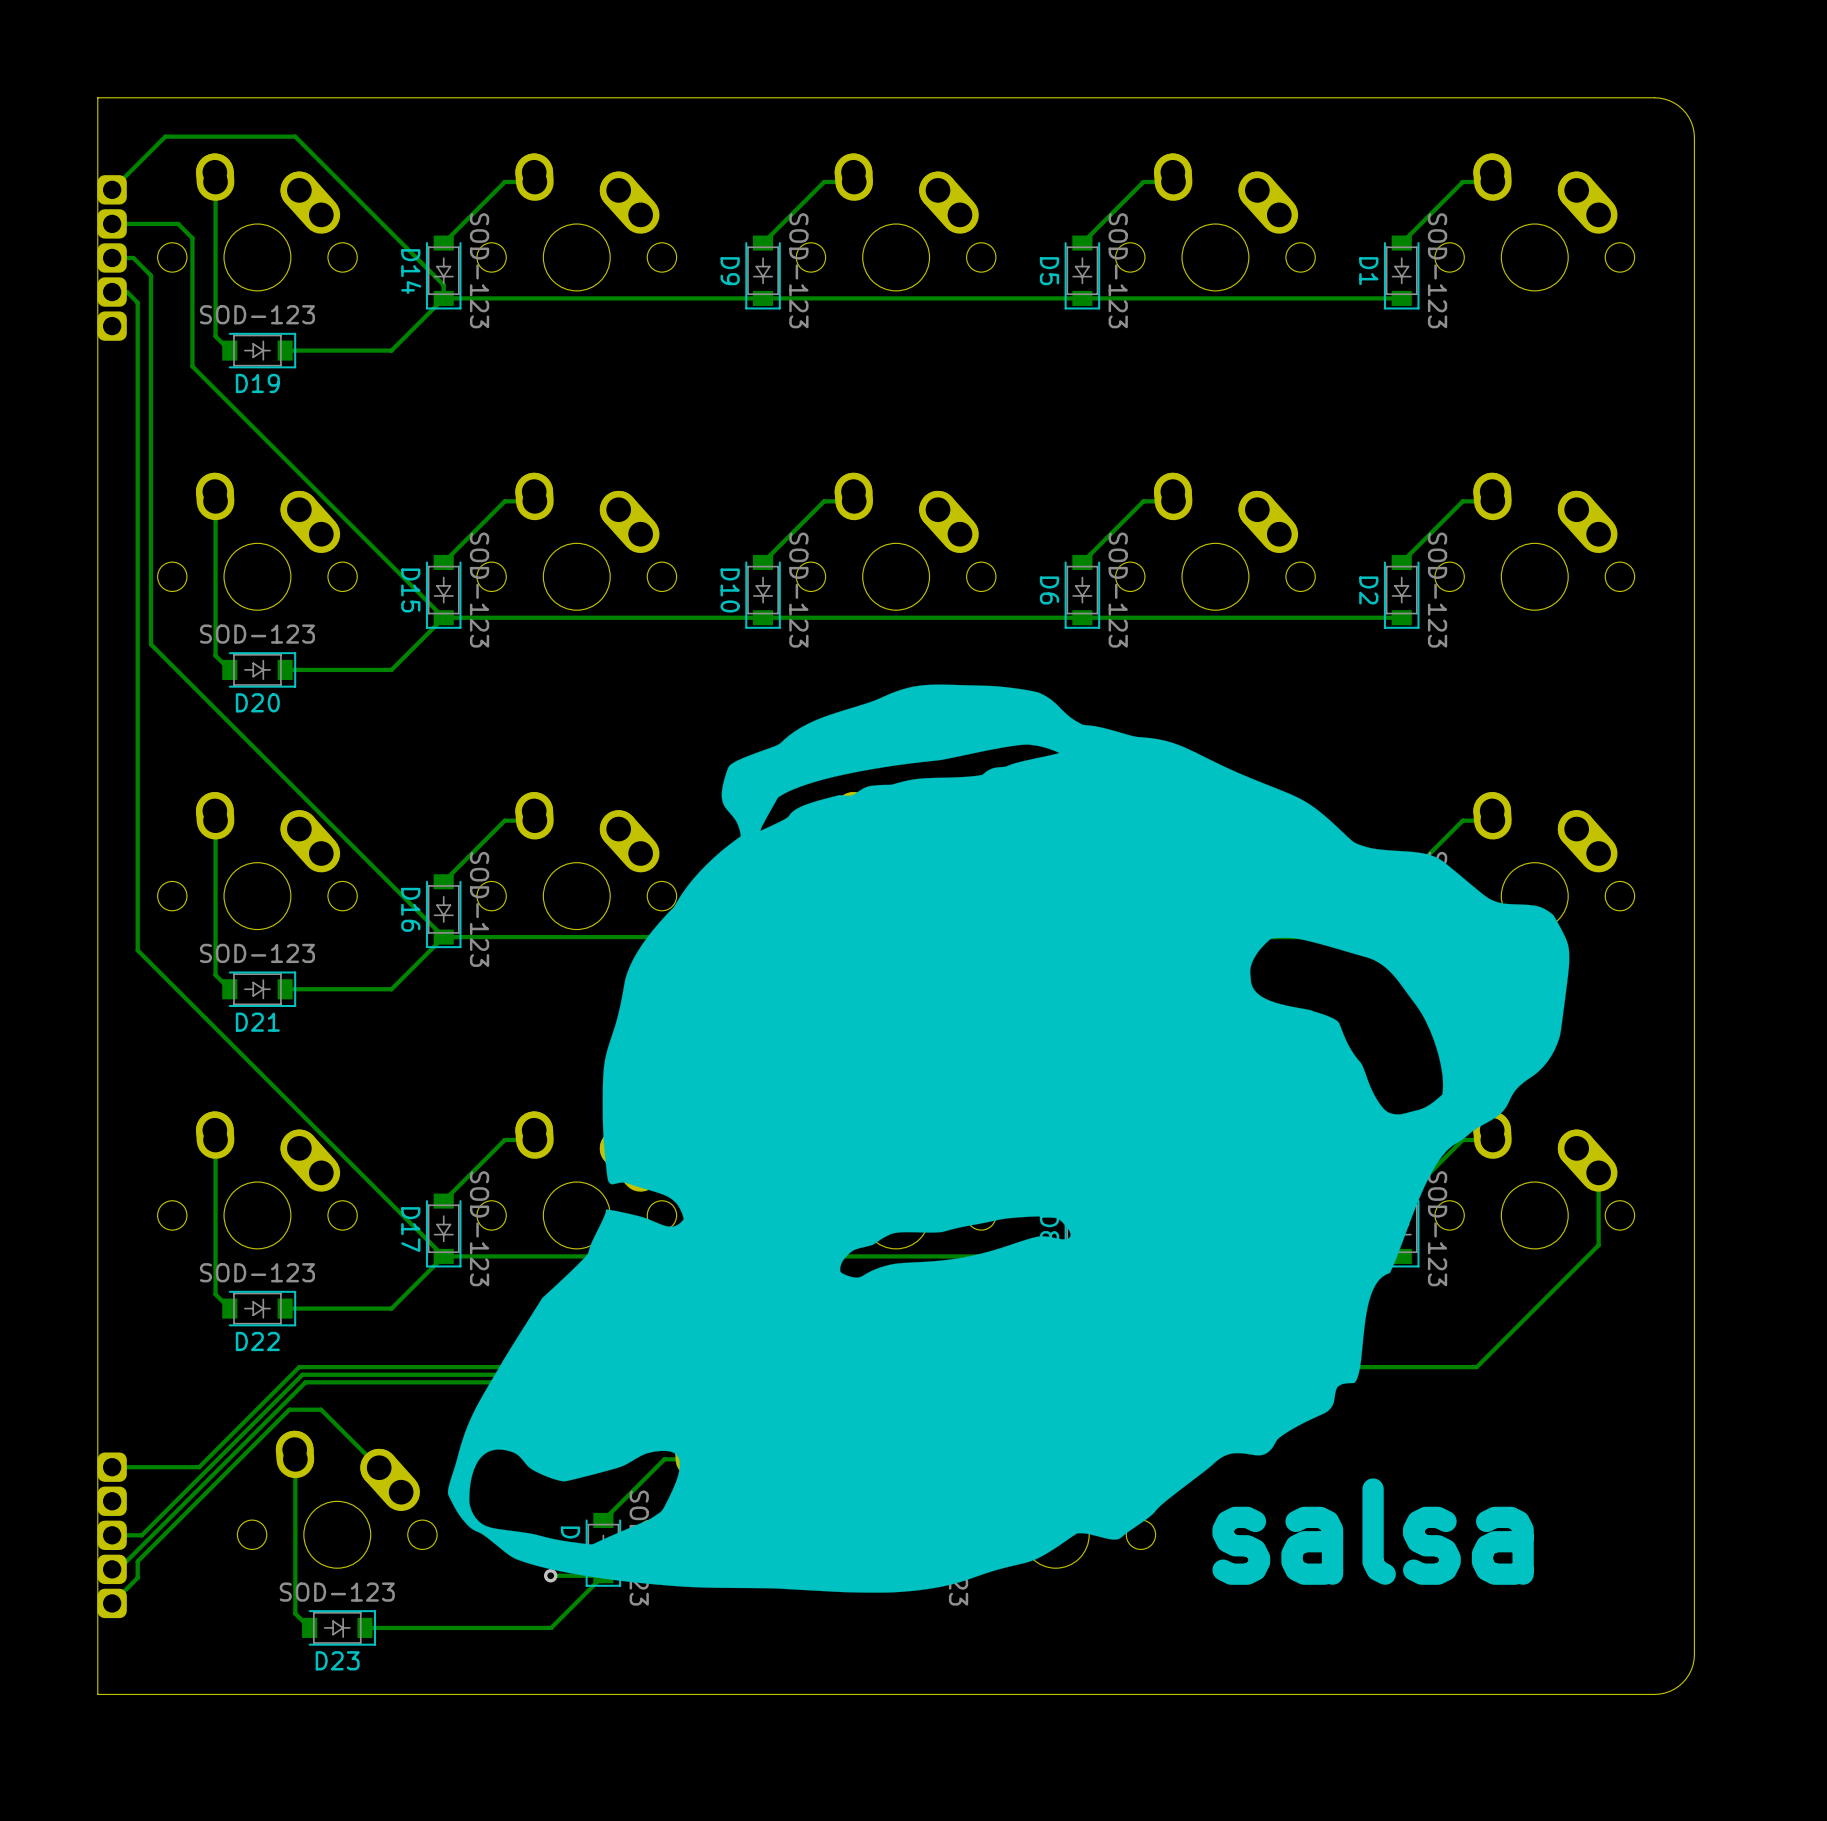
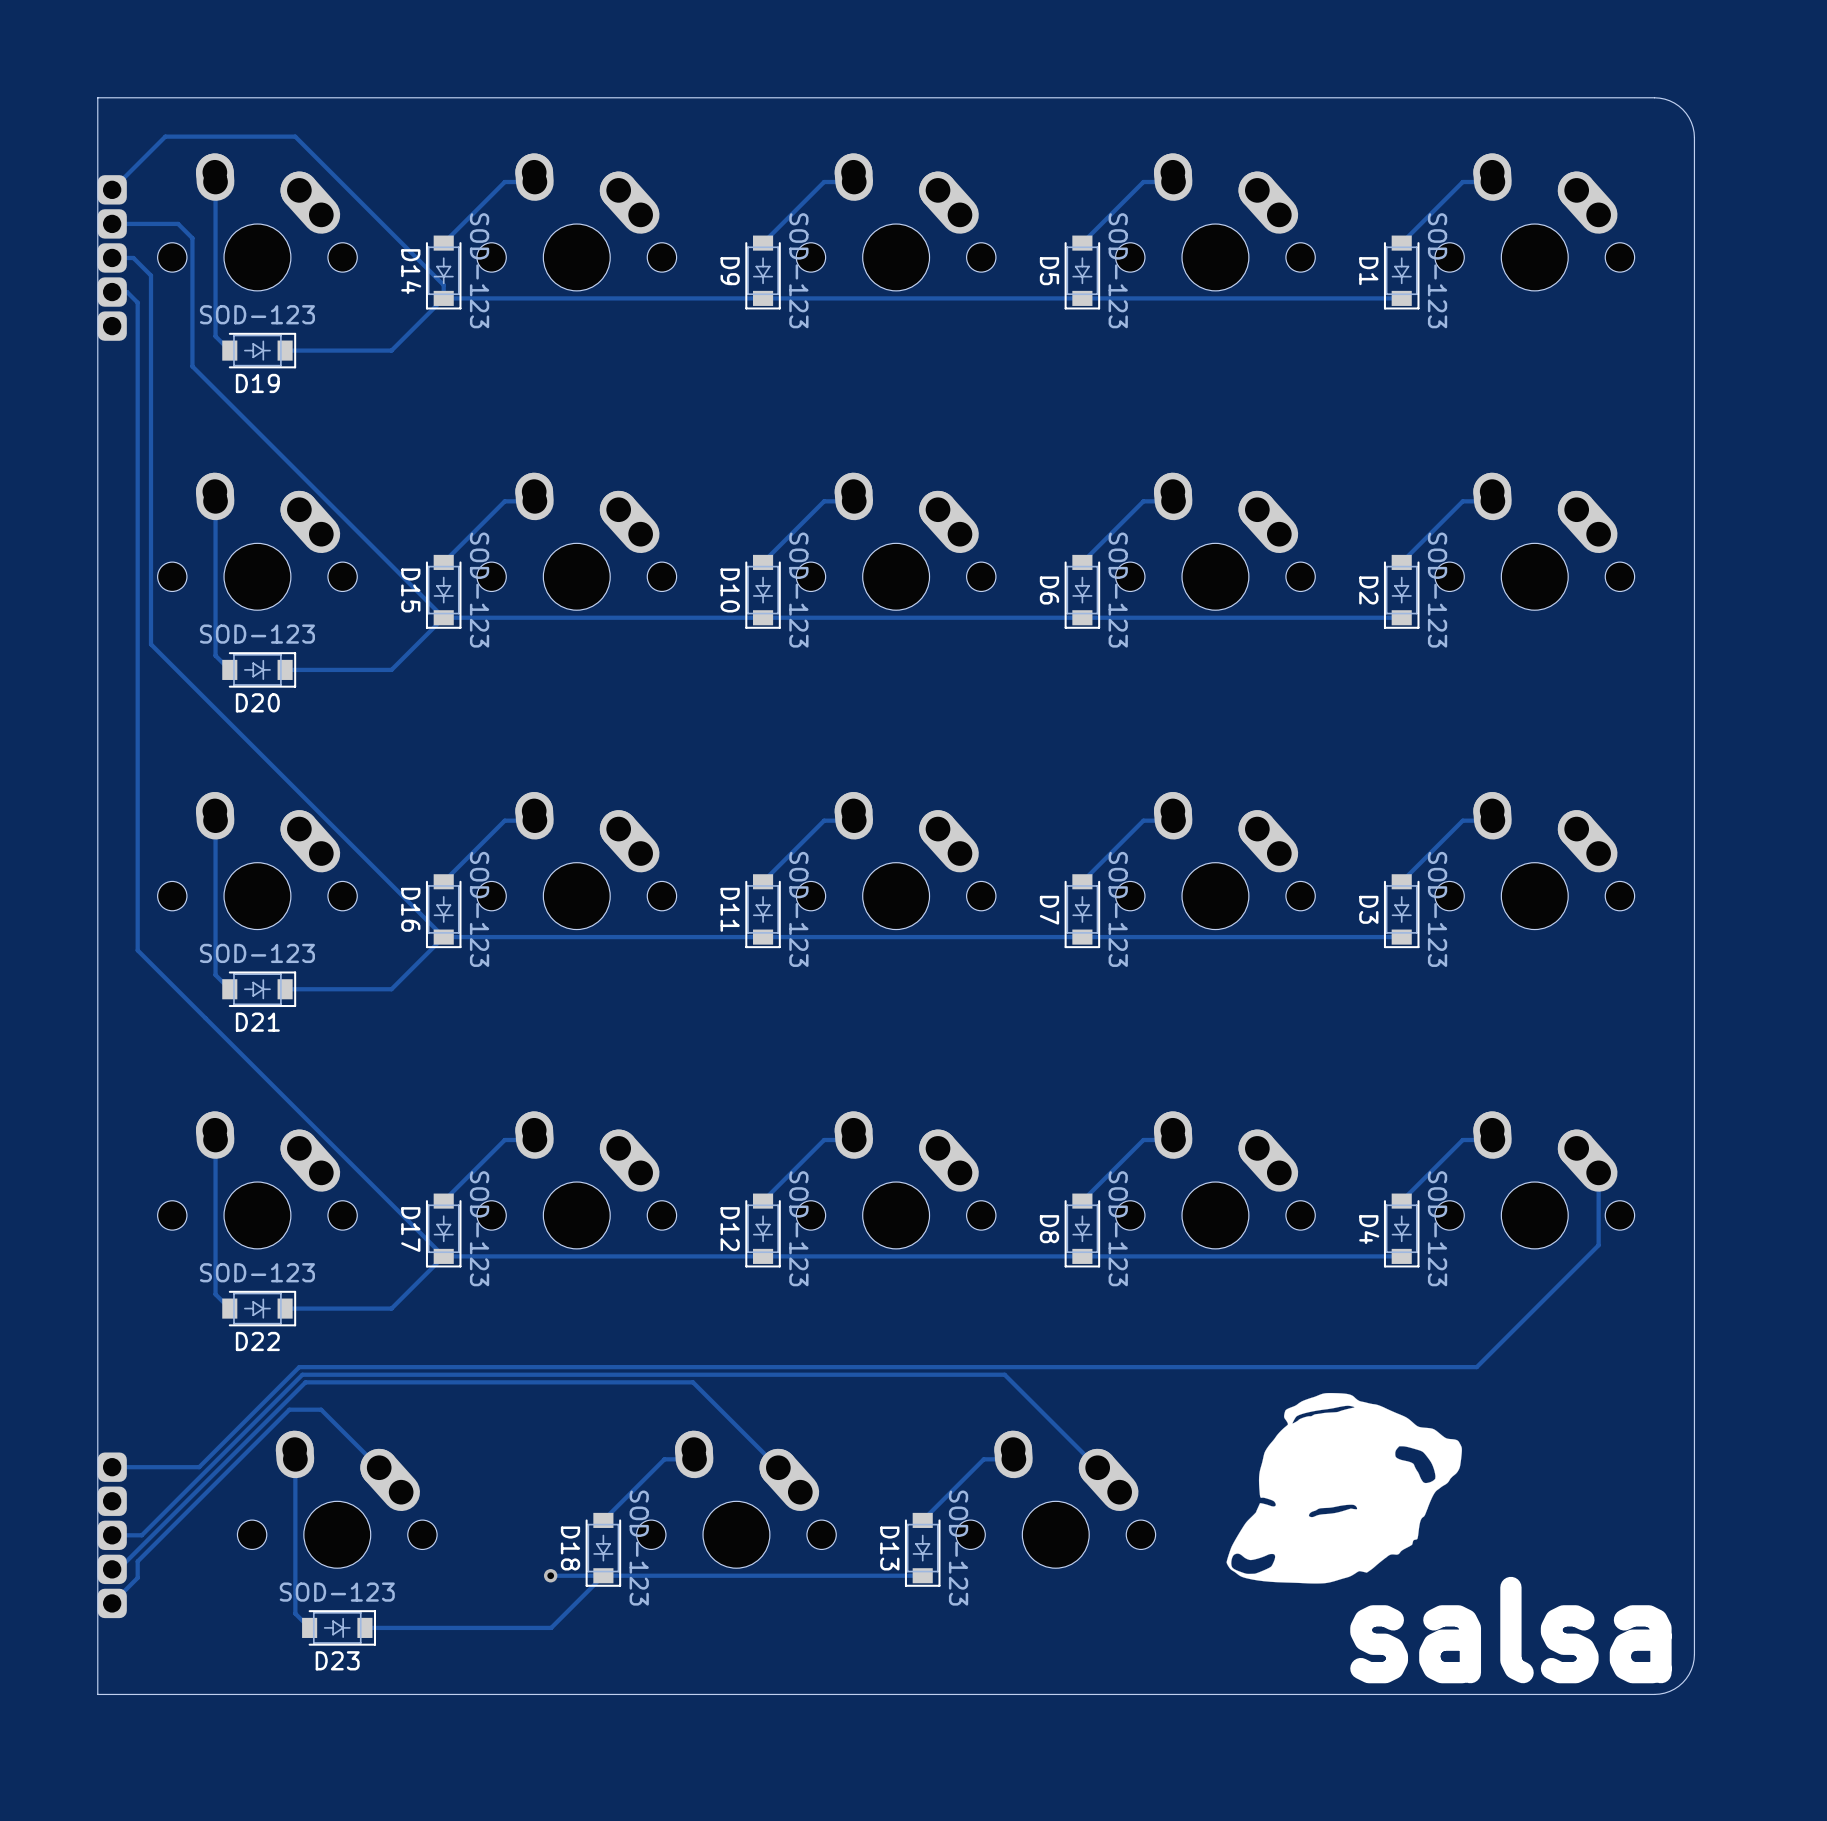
drawing: [447, 684, 1570, 1593] -> none
drawing: none -> [1226, 1392, 1462, 1584]
text position: salsa (1373, 1531) -> salsa (1510, 1630)

